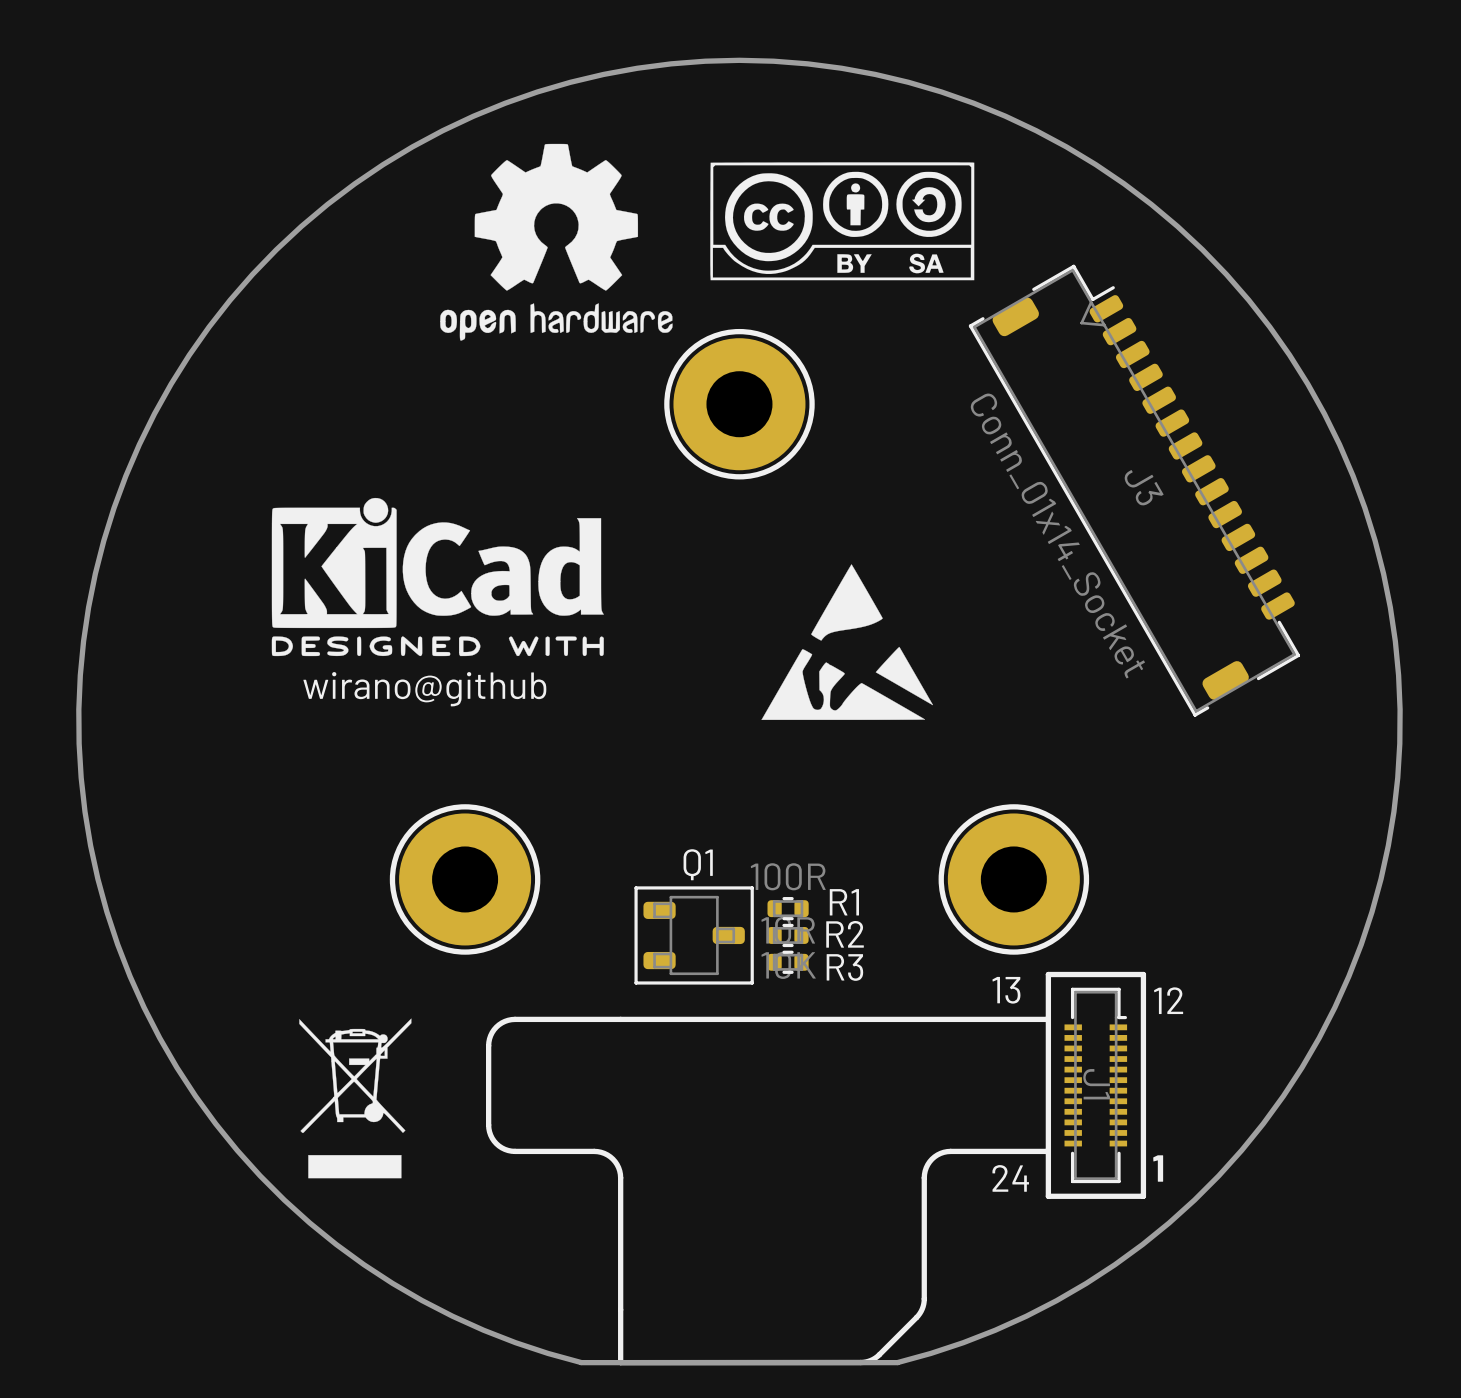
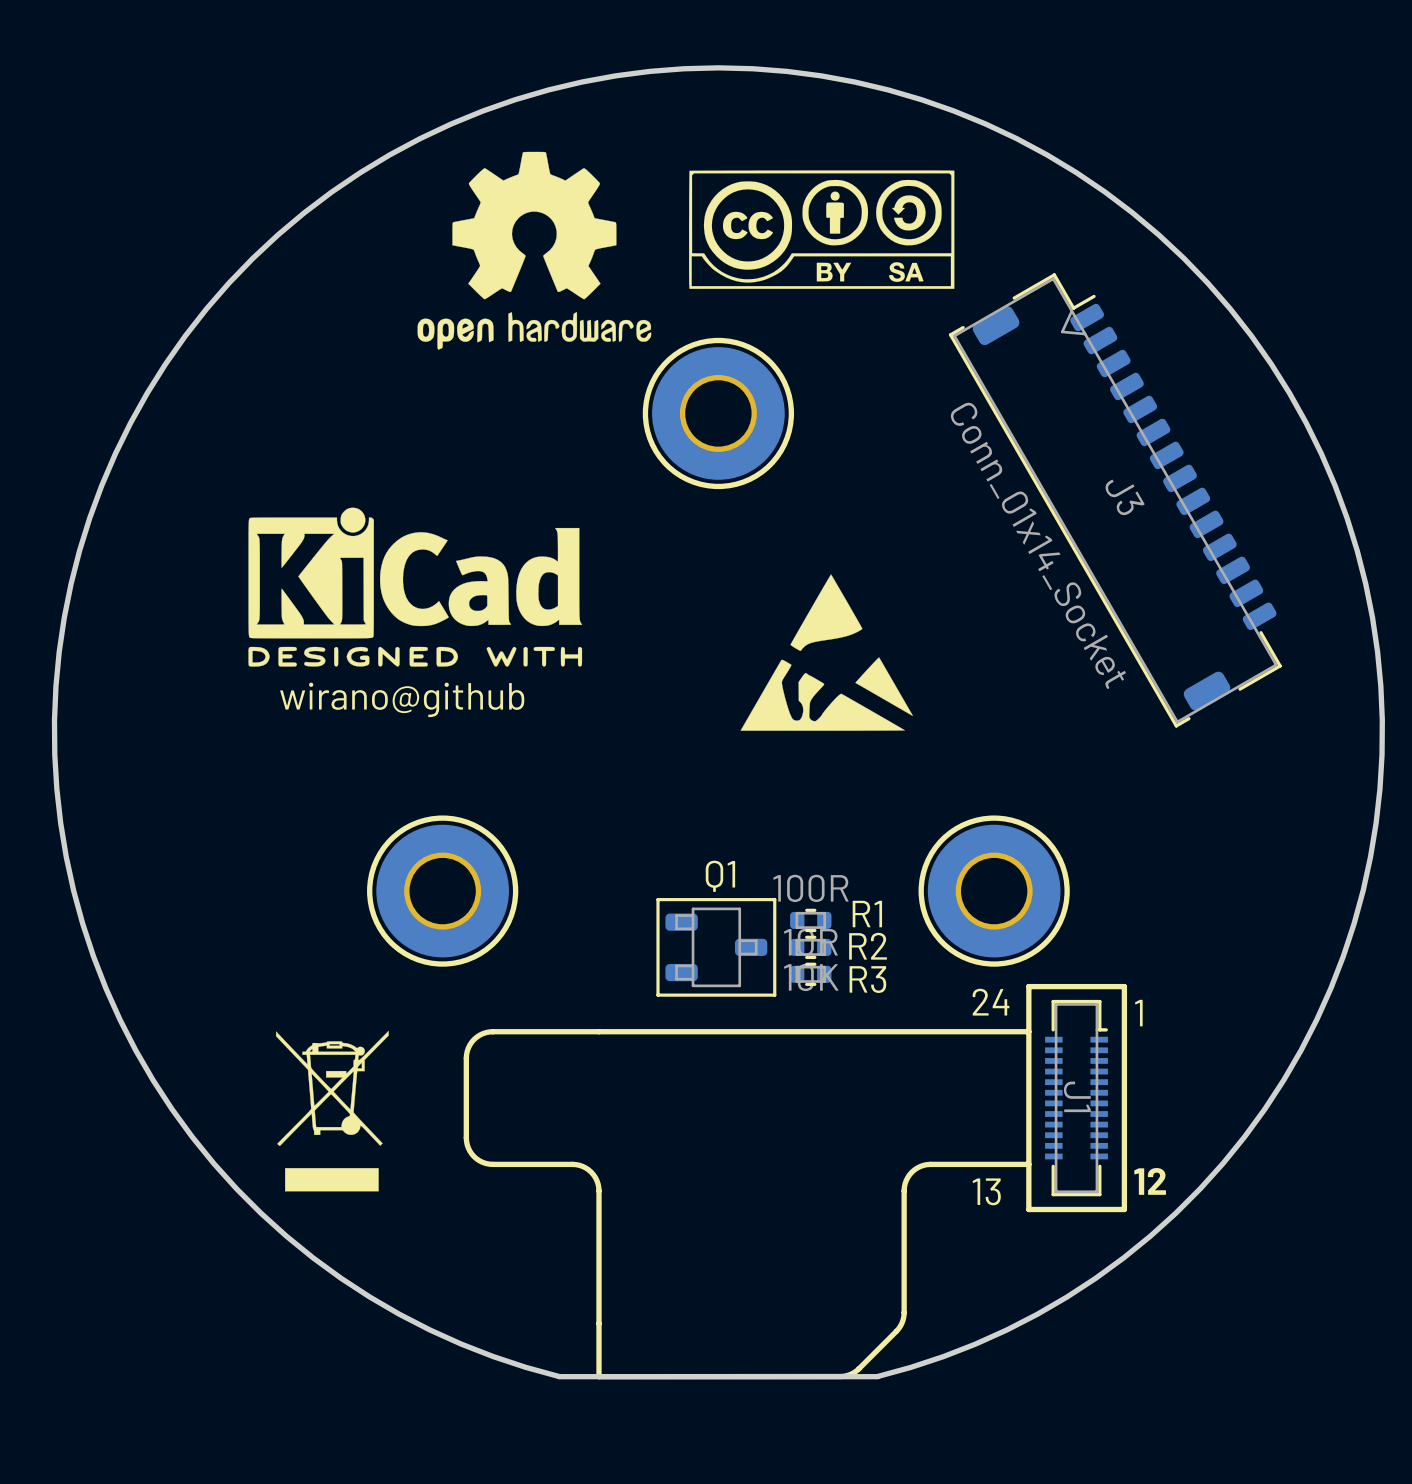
R1 position: (788, 908) -> (810, 920)
Q1 position: (694, 935) -> (716, 947)
R2 position: (788, 935) -> (810, 947)
R3 position: (788, 962) -> (810, 974)
text: 13 (1006, 990) -> 24 (991, 1002)
text: 12 (1168, 1000) -> 1 (1138, 1013)
text: 1 (1158, 1168) -> 12 (1150, 1181)
text: 24 (1010, 1178) -> 13 (986, 1191)

